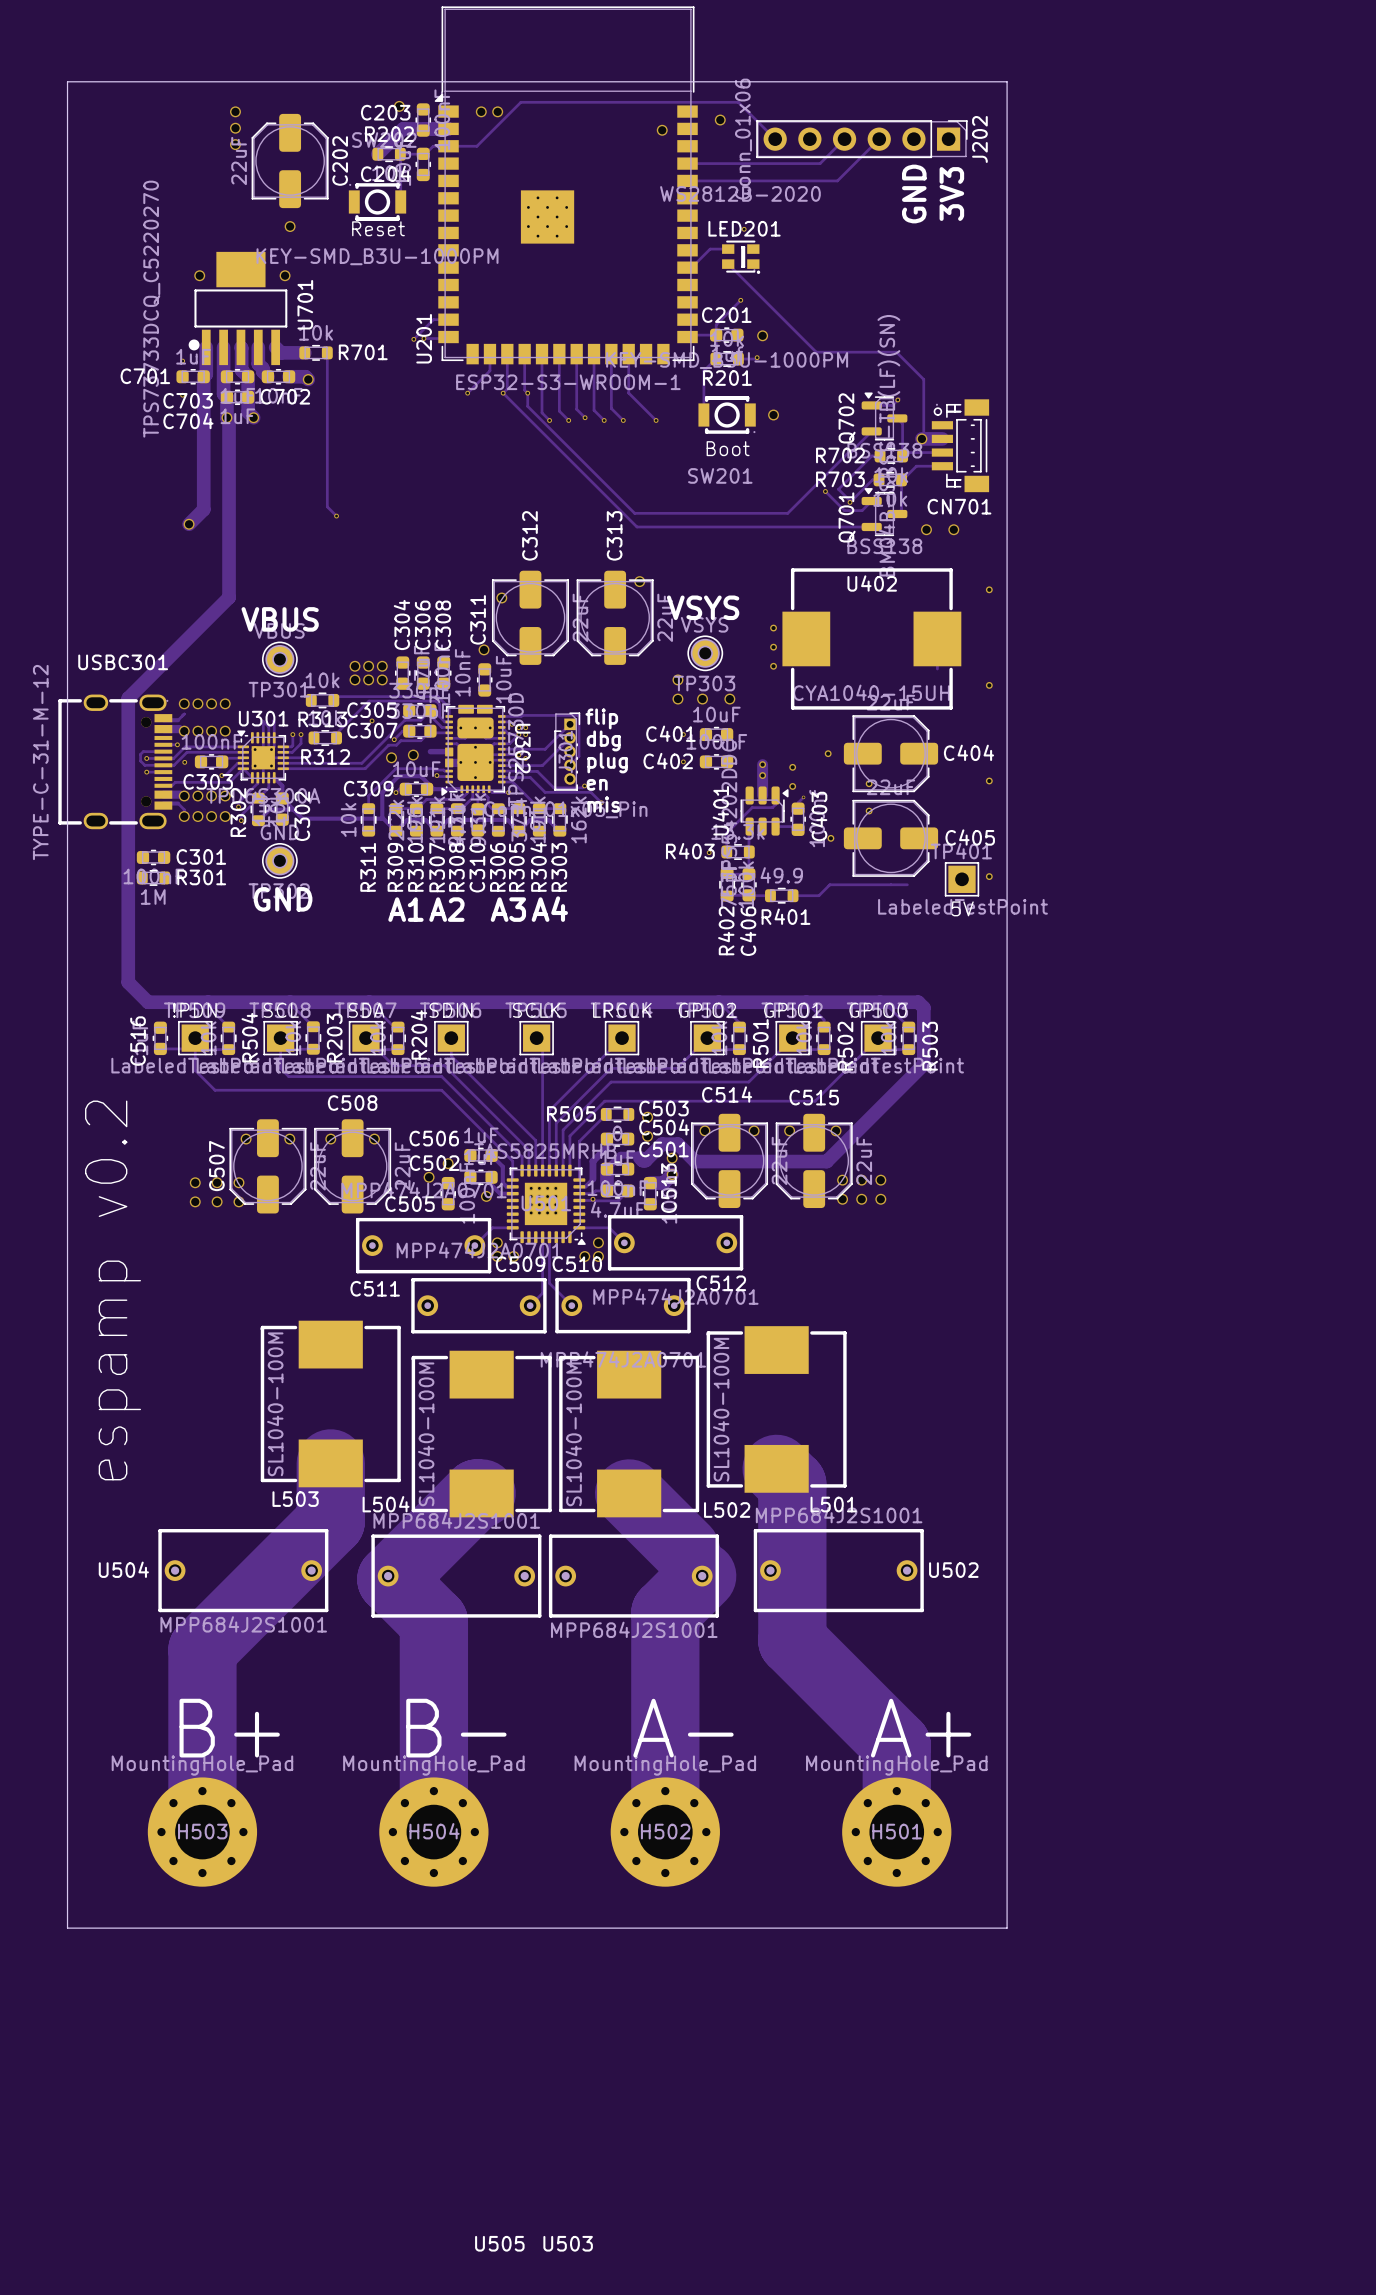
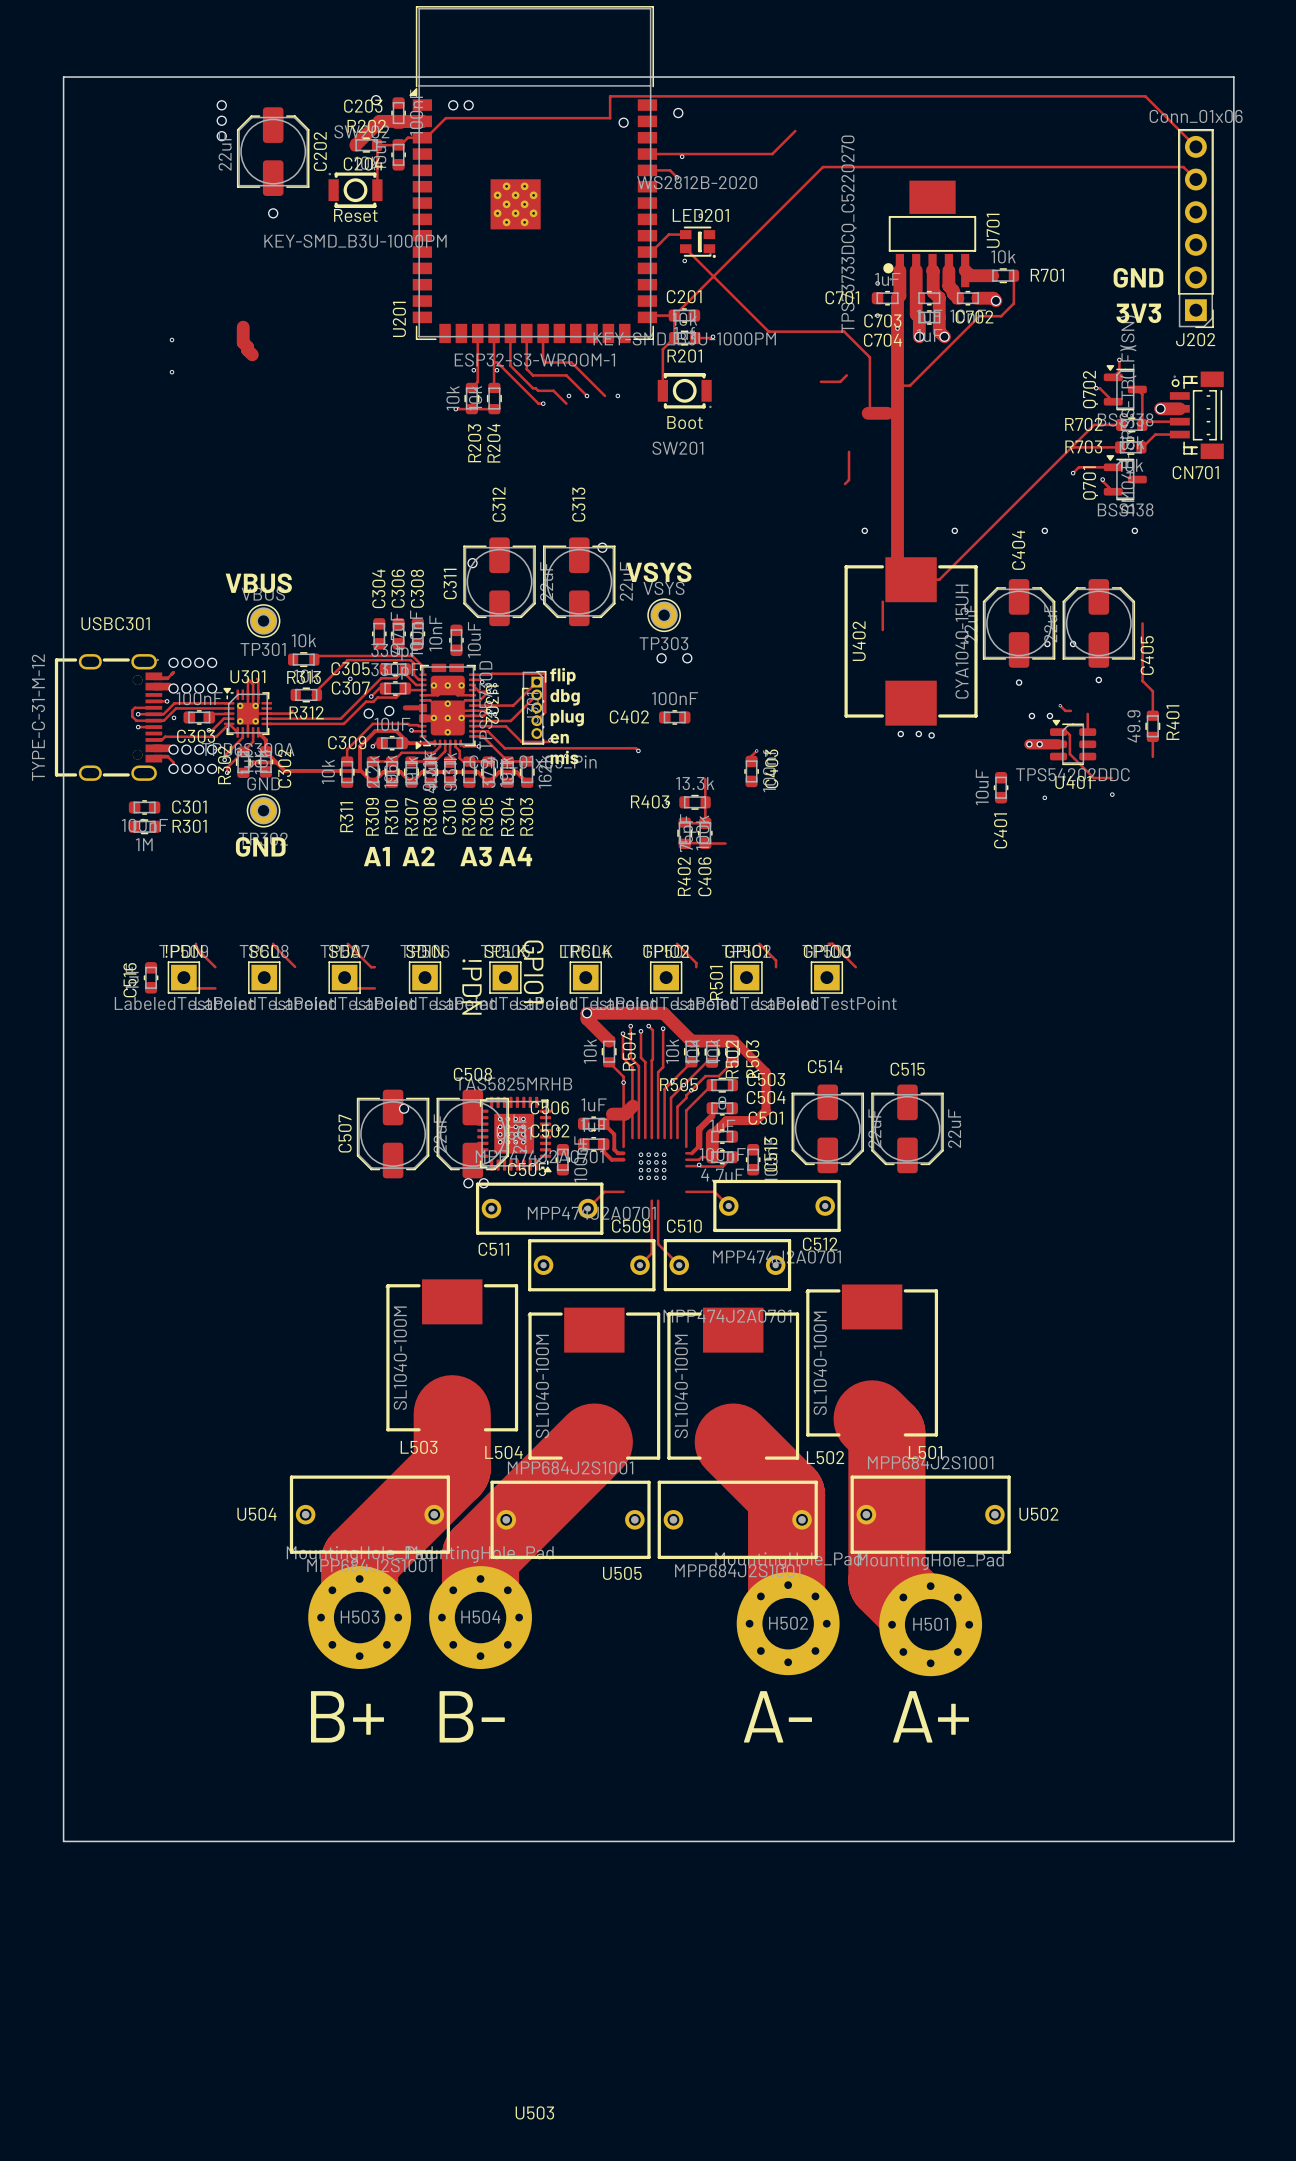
board edge: (1007, 81) (1007, 1928) (67, 1928) -> (948, 77) (1233, 77) (1233, 1841) (63, 1841) (63, 1815)
track: (647, 102) (520, 102) (476, 146) (448, 146) -> (610, 96) (610, 118) (445, 118) (426, 137)
track: (738, 102) (775, 139) -> (695, 96) (1145, 96) (1195, 146)
J202 rotation: 0° (861, 139) -> 90° clockwise (1195, 228)
J202 position: (861, 139) -> (1195, 228)
track: (879, 139) (837, 180) (711, 180) -> (677, 177) (670, 170)
via: none -> (682, 156)
via: none -> (677, 177)
text rotation: 0° (914, 194) -> 90° clockwise (1138, 277)
text position: GND (914, 194) -> GND (1138, 277)
text rotation: 0° (951, 194) -> 90° clockwise (1138, 313)
text position: 3V3 (951, 194) -> 3V3 (1138, 313)
via: (199, 275) -> none
via: (285, 275) -> none
track: none -> (899, 270) (899, 295) (897, 298) (897, 566)
track: none -> (916, 270) (916, 314) (919, 317) (919, 336)
track: none -> (932, 270) (933, 292) (939, 298) (939, 331) (944, 336)
track: none -> (948, 270) (948, 286) (957, 298)
track: none -> (965, 270) (970, 275) (992, 275)
track: none -> (1013, 275) (1013, 303) (1001, 316) (979, 316) (910, 385) (897, 385)
track: (740, 300) (716, 324) (716, 335) -> (1195, 179) (1183, 167) (822, 167) (674, 315)
via position: (740, 300) -> (684, 260)
via: none -> (877, 283)
U701 position: (237, 308) -> (929, 233)
track: none -> (977, 298) (993, 298) (995, 300)
track: (448, 319) (433, 319) (413, 339) -> none
via: none -> (995, 300)
via: (762, 335) -> none
via: none -> (877, 315)
track: (423, 338) (447, 338) -> none
via: (423, 338) -> none
via: (413, 339) -> none
track: (206, 347) (206, 374) (203, 376) (203, 509) (189, 524) -> none
track: (223, 347) (223, 393) (226, 397) (226, 417) (229, 419) (229, 597) (128, 698) (128, 982) (148, 1002) (918, 1002) (923, 1007) (923, 1064) (826, 1161) (695, 1161) (677, 1144) (662, 1144) (645, 1160) (642, 1160) (637, 1155) (620, 1155) (606, 1168) (606, 1190) (579, 1193) -> none
track: (240, 347) (241, 370) (248, 376) (248, 412) (253, 417) -> none
track: (275, 347) (281, 352) (304, 352) -> none
via: none -> (897, 328)
R701 position: (316, 352) -> (1003, 275)
track: (327, 352) (327, 506) (336, 516) -> none
track: (489, 354) (489, 370) (467, 393) -> none
track: (594, 354) (594, 410) (604, 420) -> none
track: (611, 354) (611, 408) -> none
track: (628, 354) (628, 393) (656, 420) -> none
via: none -> (919, 336)
via: none -> (944, 336)
C701 position: (193, 376) -> (887, 298)
C703 position: (237, 376) -> (929, 298)
C702 position: (278, 376) -> (967, 298)
track: (289, 376) (305, 376) (308, 379) -> none
via: (308, 379) -> none
track: (576, 382) (576, 409) (585, 417) -> (543, 359) (545, 362) (571, 362) (604, 395)
track: none -> (1119, 359) (1119, 371) (1113, 377)
via: none -> (1119, 359)
track: none -> (494, 362) (497, 362) (538, 403) (543, 403)
track: (507, 388) (503, 393) (636, 526) (871, 526) -> (477, 366) (477, 382) (471, 387)
track: (542, 388) (542, 412) (549, 420) -> (510, 365) (532, 388) (538, 390) (553, 390) (566, 403)
track: (524, 390) (527, 393) (527, 406) (634, 513) (787, 513) (871, 431) -> (494, 367) (494, 387)
track: (559, 392) (559, 411) (568, 420) -> (526, 369) (533, 375) (566, 375) (575, 384)
via: (467, 393) -> none
C704 position: (237, 397) -> (929, 317)
via: (897, 399) -> none
track: none -> (1096, 388) (1099, 388) (1113, 401)
via: none -> (1096, 388)
via: (773, 415) -> none
Q702 position: (884, 416) -> (1125, 387)
via: (226, 417) -> none
via: (253, 417) -> none
via: (585, 417) -> none
track: (897, 418) (902, 423) (902, 455) -> (1137, 389) (1142, 394) (1142, 424)
via: (549, 420) -> none
via: (568, 420) -> none
via: none -> (543, 403)
track: none -> (455, 409) (494, 409)
via: none -> (455, 409)
track: none -> (1160, 408) (1179, 408)
via: none -> (1160, 408)
via: (921, 438) -> none
CN701 position: (960, 445) -> (1196, 415)
track: none -> (1121, 424) (1094, 424) (939, 579) (911, 579)
track: (906, 452) (942, 452) -> (1145, 421) (1179, 421)
track: (880, 455) (871, 455) (838, 489) (850, 502) (872, 479) (879, 479) -> none
R702 position: (891, 455) -> (1131, 424)
track: (942, 466) (916, 466) (902, 479) -> (1179, 434) (1155, 434) (1142, 447)
track: none -> (1072, 446) (1120, 447)
R703 position: (890, 479) -> (1130, 447)
track: (825, 491) (844, 510) (862, 510) (871, 501) -> none
via: (825, 491) -> none
track: none -> (1113, 467) (1078, 467) (1073, 473)
via: (850, 502) -> none
via: none -> (1073, 473)
track: none -> (1102, 479) (1113, 491)
via: none -> (1102, 479)
Q701 position: (884, 512) -> (1125, 477)
via: (336, 516) -> none
via: (189, 524) -> none
via: (926, 529) -> none
via: (953, 529) -> none
via: none -> (864, 530)
via: none -> (1044, 530)
via: none -> (1134, 530)
via position: (989, 589) -> (954, 530)
via: (773, 628) -> none
U402 rotation: 0° (871, 638) -> 90° counterclockwise (911, 641)
via: (773, 647) -> none
via: (484, 649) -> none
track: none -> (1142, 623) (1142, 680) (1152, 691) (1152, 715)
via: (354, 666) -> none
via: (368, 666) -> none
via: (382, 666) -> none
via: (773, 666) -> none
via: (354, 679) -> none
via: (368, 679) -> none
via: (382, 679) -> none
via: (677, 679) -> none
via: none -> (1047, 644)
via: none -> (1073, 644)
via: (989, 685) -> none
via: (677, 699) -> none
C401 value position: 10uF (716, 714) -> 10uF (982, 787)
via: none -> (1098, 680)
via: none -> (1019, 682)
C401 name position: C401 (670, 733) -> C401 (1000, 830)
track: (292, 734) (292, 745) (283, 746) -> none
via: (292, 734) -> none
track: (301, 734) (301, 743) (292, 752) (283, 752) -> none
via: (301, 734) -> none
via: (683, 734) -> none
C401 rotation: 0° (716, 734) -> 90° clockwise (1001, 787)
C401 position: (716, 734) -> (1001, 787)
track: none -> (1060, 705) (1065, 710) (1070, 710)
via: none -> (1060, 705)
via: (828, 753) -> none
C404 rotation: 0° (890, 753) -> 90° counterclockwise (1019, 623)
C404 position: (890, 753) -> (1019, 623)
track: none -> (1087, 713) (1087, 732)
via: none -> (1031, 716)
via: none -> (1049, 716)
via: (683, 761) -> none
track: (762, 764) (762, 795) -> none
via: (762, 764) -> none
via: (792, 767) -> none
via: (762, 775) -> none
track: (501, 776) (530, 777) (545, 792) (590, 792) (601, 802) -> (472, 731) (487, 731) (504, 748) (635, 748) (638, 750)
track: none -> (1058, 732) (1066, 732) (1069, 735) (1069, 754) (1093, 778) (1111, 778)
via: none -> (900, 734)
via: none -> (918, 734)
track: none -> (1152, 736) (1152, 756)
via: (869, 783) -> none
via: (792, 786) -> none
track: none -> (1029, 744) (1058, 744)
via: none -> (1029, 744)
via: none -> (1039, 744)
track: (775, 795) (775, 804) (772, 807) (752, 807) (726, 833) (726, 852) -> none
via: none -> (638, 750)
U401 rotation: 0° (764, 811) -> 90° counterclockwise (1073, 742)
U401 position: (764, 811) -> (1073, 742)
via: (869, 811) -> none
track: (775, 826) (794, 826) -> none
C405 name position: C405 (970, 837) -> C405 (1147, 655)
via: (830, 838) -> none
C405 rotation: 0° (890, 838) -> 90° counterclockwise (1098, 623)
C405 position: (890, 838) -> (1098, 623)
via: none -> (1112, 794)
via: none -> (1044, 797)
R401 value position: 49.9 (781, 875) -> 49.9 (1133, 726)
via: (989, 876) -> none
TP401: LabeledTestPoint (962, 879) -> none
track: (907, 884) (829, 884) (818, 895) (793, 895) -> none
R401 rotation: 0° (781, 895) -> 90° clockwise (1152, 726)
R401 position: (781, 895) -> (1152, 726)
R401 name position: R401 (785, 916) -> R401 (1172, 722)
R204 name position: R204 (419, 1034) -> R204 (493, 443)
track: (195, 1038) (195, 1070) (215, 1090) (441, 1090) (512, 1161) (512, 1180) -> none
R504 position: (228, 1038) -> (609, 1051)
R203 position: (313, 1038) -> (471, 398)
R203 name position: R203 (334, 1038) -> R203 (474, 443)
track: (365, 1038) (393, 1065) (444, 1065) (528, 1150) (528, 1170) -> none
R204 position: (398, 1038) -> (494, 398)
track: (451, 1038) (451, 1056) (535, 1140) (535, 1170) -> none
track: (622, 1038) (549, 1110) (549, 1170) -> none
R501 position: (739, 1038) -> (691, 1051)
R502 position: (824, 1038) -> (712, 1052)
R503 position: (908, 1038) -> (732, 1051)
track: (542, 1044) (542, 1170) -> none
text: none -> GPIO1 (533, 971)
track: (160, 1048) (184, 1048) -> none
track: (313, 1049) (291, 1049) (280, 1038) (280, 1068) (288, 1076) (441, 1076) (522, 1156) (522, 1170) -> none
track: (739, 1049) (718, 1049) (707, 1038) (677, 1068) (611, 1068) (556, 1123) (556, 1170) -> none
track: (824, 1049) (804, 1049) (792, 1038) (748, 1082) (611, 1082) (563, 1130) (563, 1170) -> none
track: (908, 1049) (889, 1049) (878, 1038) (815, 1101) (604, 1101) (569, 1136) (569, 1170) -> none
text: none -> !PDN (471, 987)
via: none -> (586, 1013)
track: none -> (630, 1026) (630, 1057) (638, 1066) (638, 1138)
via: none -> (630, 1026)
track: none -> (648, 1026) (652, 1030) (651, 1138)
via: none -> (648, 1026)
track: none -> (663, 1028) (663, 1067) (658, 1072) (658, 1138)
via: none -> (663, 1028)
track: none -> (641, 1031) (641, 1057) (645, 1062) (645, 1138)
via: none -> (641, 1031)
track: none -> (622, 1033) (622, 1057) (632, 1067) (632, 1138)
via: none -> (622, 1033)
track: none -> (609, 1041) (586, 1018) (586, 1013) (663, 1013) (691, 1041) (734, 1041) (766, 1072) (766, 1110) (756, 1120) (726, 1120) (712, 1134) (712, 1157) (686, 1159)
track: (606, 1114) (579, 1141) (579, 1180) -> (711, 1085) (686, 1110) (686, 1146)
R505 position: (617, 1114) -> (722, 1085)
via: (647, 1117) -> none
track: none -> (609, 1062) (623, 1076) (623, 1146)
track: none -> (691, 1062) (664, 1089) (664, 1138)
track: none -> (712, 1062) (706, 1062) (671, 1097) (671, 1138)
track: none -> (732, 1062) (718, 1076) (705, 1076) (677, 1106) (677, 1138)
via: (704, 1130) -> none
via: (754, 1130) -> none
via: (789, 1130) -> none
via: (836, 1130) -> none
via: (647, 1136) -> none
via: (246, 1139) -> none
via: (289, 1139) -> none
via: (330, 1139) -> none
via: (374, 1139) -> none
C503 position: (617, 1139) -> (722, 1108)
track: (606, 1147) (592, 1161) (592, 1179) (585, 1186) (579, 1186) -> (712, 1116) (699, 1129) (699, 1146) (691, 1153) (686, 1153)
via: none -> (672, 1081)
via: none -> (623, 1082)
via: none -> (683, 1085)
C506 position: (480, 1155) -> (593, 1123)
track: (491, 1155) (502, 1166) (502, 1182) (506, 1186) (512, 1186) -> (603, 1123) (614, 1134) (614, 1149) (617, 1153) (623, 1153)
via: none -> (691, 1090)
via: (672, 1158) -> none
C514 position: (729, 1160) -> (827, 1128)
C515 position: (814, 1160) -> (907, 1128)
via: (448, 1163) -> none
C507 position: (267, 1166) -> (393, 1134)
C508 position: (352, 1166) -> (472, 1134)
C504 position: (617, 1169) -> (722, 1136)
via: (672, 1174) -> none
C502 position: (480, 1177) -> (593, 1144)
track: (491, 1177) (491, 1185) (500, 1193) (512, 1193) -> (603, 1144) (603, 1151) (611, 1159) (623, 1159)
via: (842, 1180) -> none
via: (861, 1180) -> none
via: (880, 1180) -> none
via: (195, 1182) -> none
via: (217, 1182) -> none
via: (238, 1182) -> none
C501 position: (617, 1190) -> (722, 1157)
track: (628, 1190) (618, 1200) (579, 1200) -> (732, 1157) (722, 1166) (686, 1166)
C505 position: (448, 1193) -> (562, 1159)
C513 position: (650, 1193) -> (753, 1159)
via: (486, 1196) -> none
via: (842, 1199) -> none
via: (861, 1199) -> none
via: (880, 1199) -> none
via: (195, 1201) -> none
via: (217, 1201) -> none
via: (238, 1201) -> none
via: none -> (641, 1154)
via: none -> (648, 1154)
via: none -> (656, 1154)
via: none -> (664, 1154)
track: (512, 1227) (492, 1227) (474, 1245) -> (623, 1191) (604, 1191) (587, 1208)
track: (579, 1227) (609, 1227) (624, 1242) -> (686, 1191) (714, 1191) (728, 1206)
via: none -> (641, 1162)
via: none -> (648, 1162)
via: none -> (656, 1162)
via: none -> (664, 1162)
track: (542, 1237) (542, 1293) (530, 1305) -> (651, 1200) (651, 1253) (640, 1265)
track: (549, 1237) (549, 1283) (571, 1305) -> (658, 1200) (658, 1244) (679, 1265)
via: none -> (699, 1164)
via: (497, 1242) -> none
via: (598, 1242) -> none
C512 position: (675, 1242) -> (776, 1205)
via: none -> (641, 1170)
via: none -> (648, 1170)
via: none -> (656, 1170)
via: none -> (664, 1170)
C511 position: (423, 1245) -> (539, 1208)
via: none -> (641, 1177)
via: none -> (648, 1177)
via: none -> (656, 1177)
via: none -> (664, 1177)
via: (584, 1256) -> none
via: (598, 1256) -> none
text: espamp v0.2 (113, 1290) -> none
C509 position: (478, 1305) -> (591, 1265)
C510 position: (623, 1305) -> (727, 1265)
L503 position: (330, 1403) -> (452, 1357)
L501 position: (776, 1409) -> (871, 1362)
L504 position: (481, 1434) -> (594, 1386)
L502 position: (628, 1434) -> (733, 1386)
track: (330, 1463) (330, 1521) (202, 1649) (202, 1832) -> none
track: (776, 1468) (792, 1484) (792, 1641) (896, 1745) (896, 1832) -> none
track: (481, 1493) (477, 1493) (391, 1579) (433, 1621) (433, 1832) -> none
track: (629, 1493) (685, 1550) -> none
track: none -> (452, 1413) (452, 1468) (359, 1560) (359, 1617)
track: none -> (872, 1418) (886, 1433) (886, 1581) (930, 1624)
track: none -> (594, 1442) (480, 1555) (480, 1617)
track: none -> (733, 1442) (786, 1495) (786, 1622)
U504 position: (243, 1570) -> (369, 1514)
U502 position: (838, 1570) -> (930, 1514)
U505 position: (456, 1576) -> (570, 1519)
U503 position: (633, 1576) -> (737, 1519)
track: (702, 1576) (665, 1612) (665, 1832) -> none
text position: B+ (229, 1728) -> B+ (347, 1716)
text position: B- (456, 1728) -> B- (472, 1716)
text position: A- (683, 1728) -> A- (777, 1716)
text position: A+ (921, 1728) -> A+ (930, 1716)
H503 position: (202, 1832) -> (359, 1617)
H504 position: (433, 1832) -> (480, 1617)
H502 position: (665, 1832) -> (788, 1623)
H501 position: (896, 1832) -> (930, 1624)
U505 name position: U505 (499, 2243) -> U505 (622, 1573)

